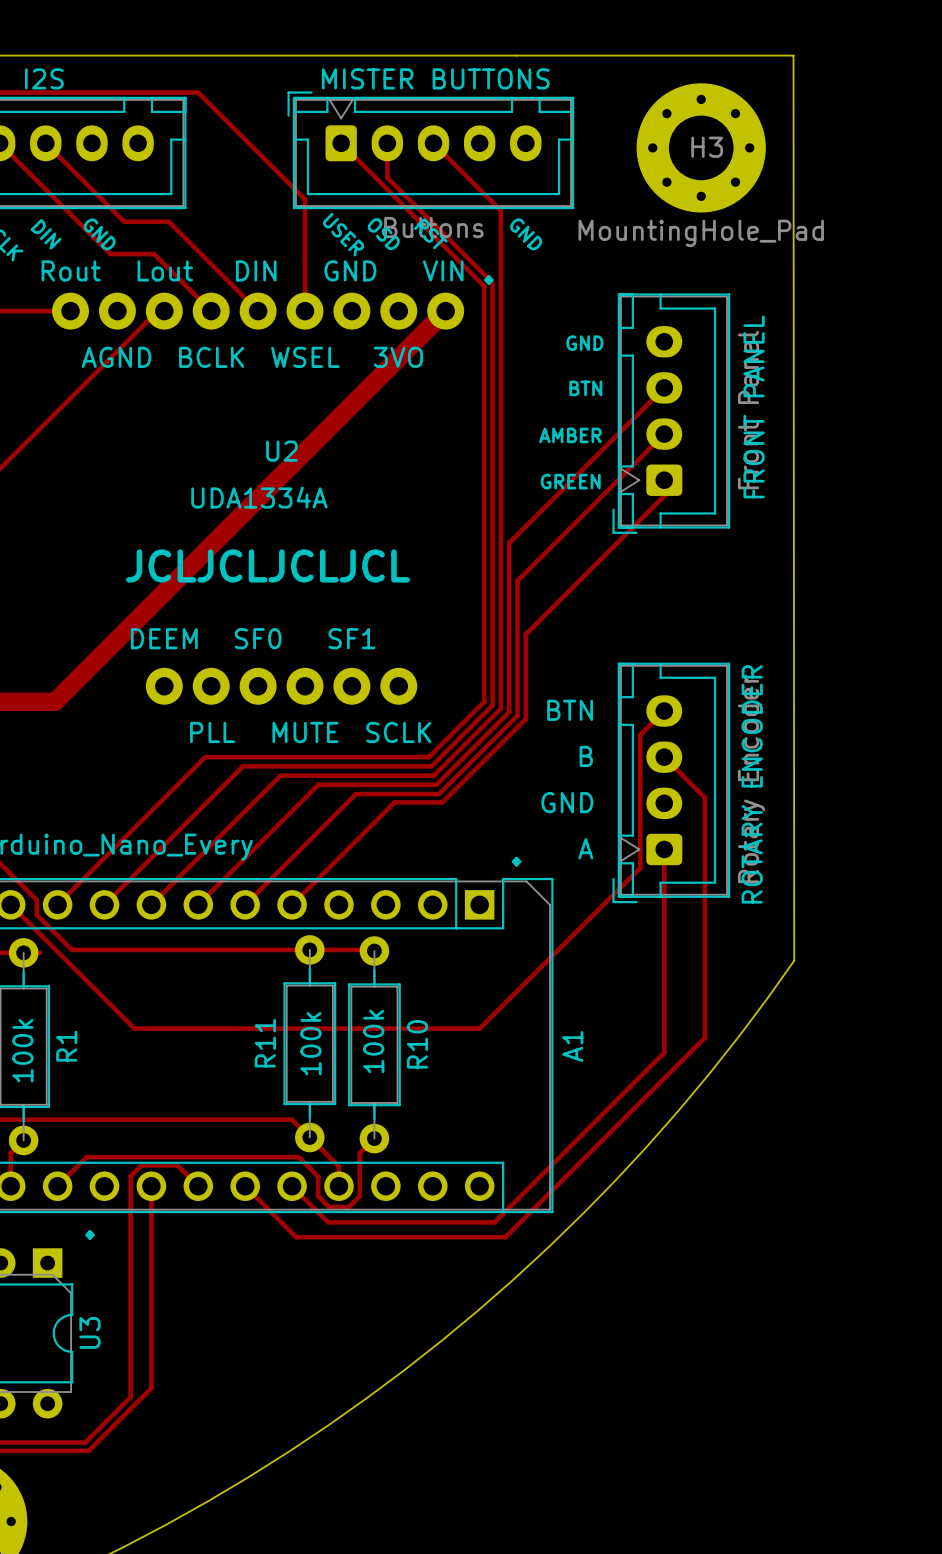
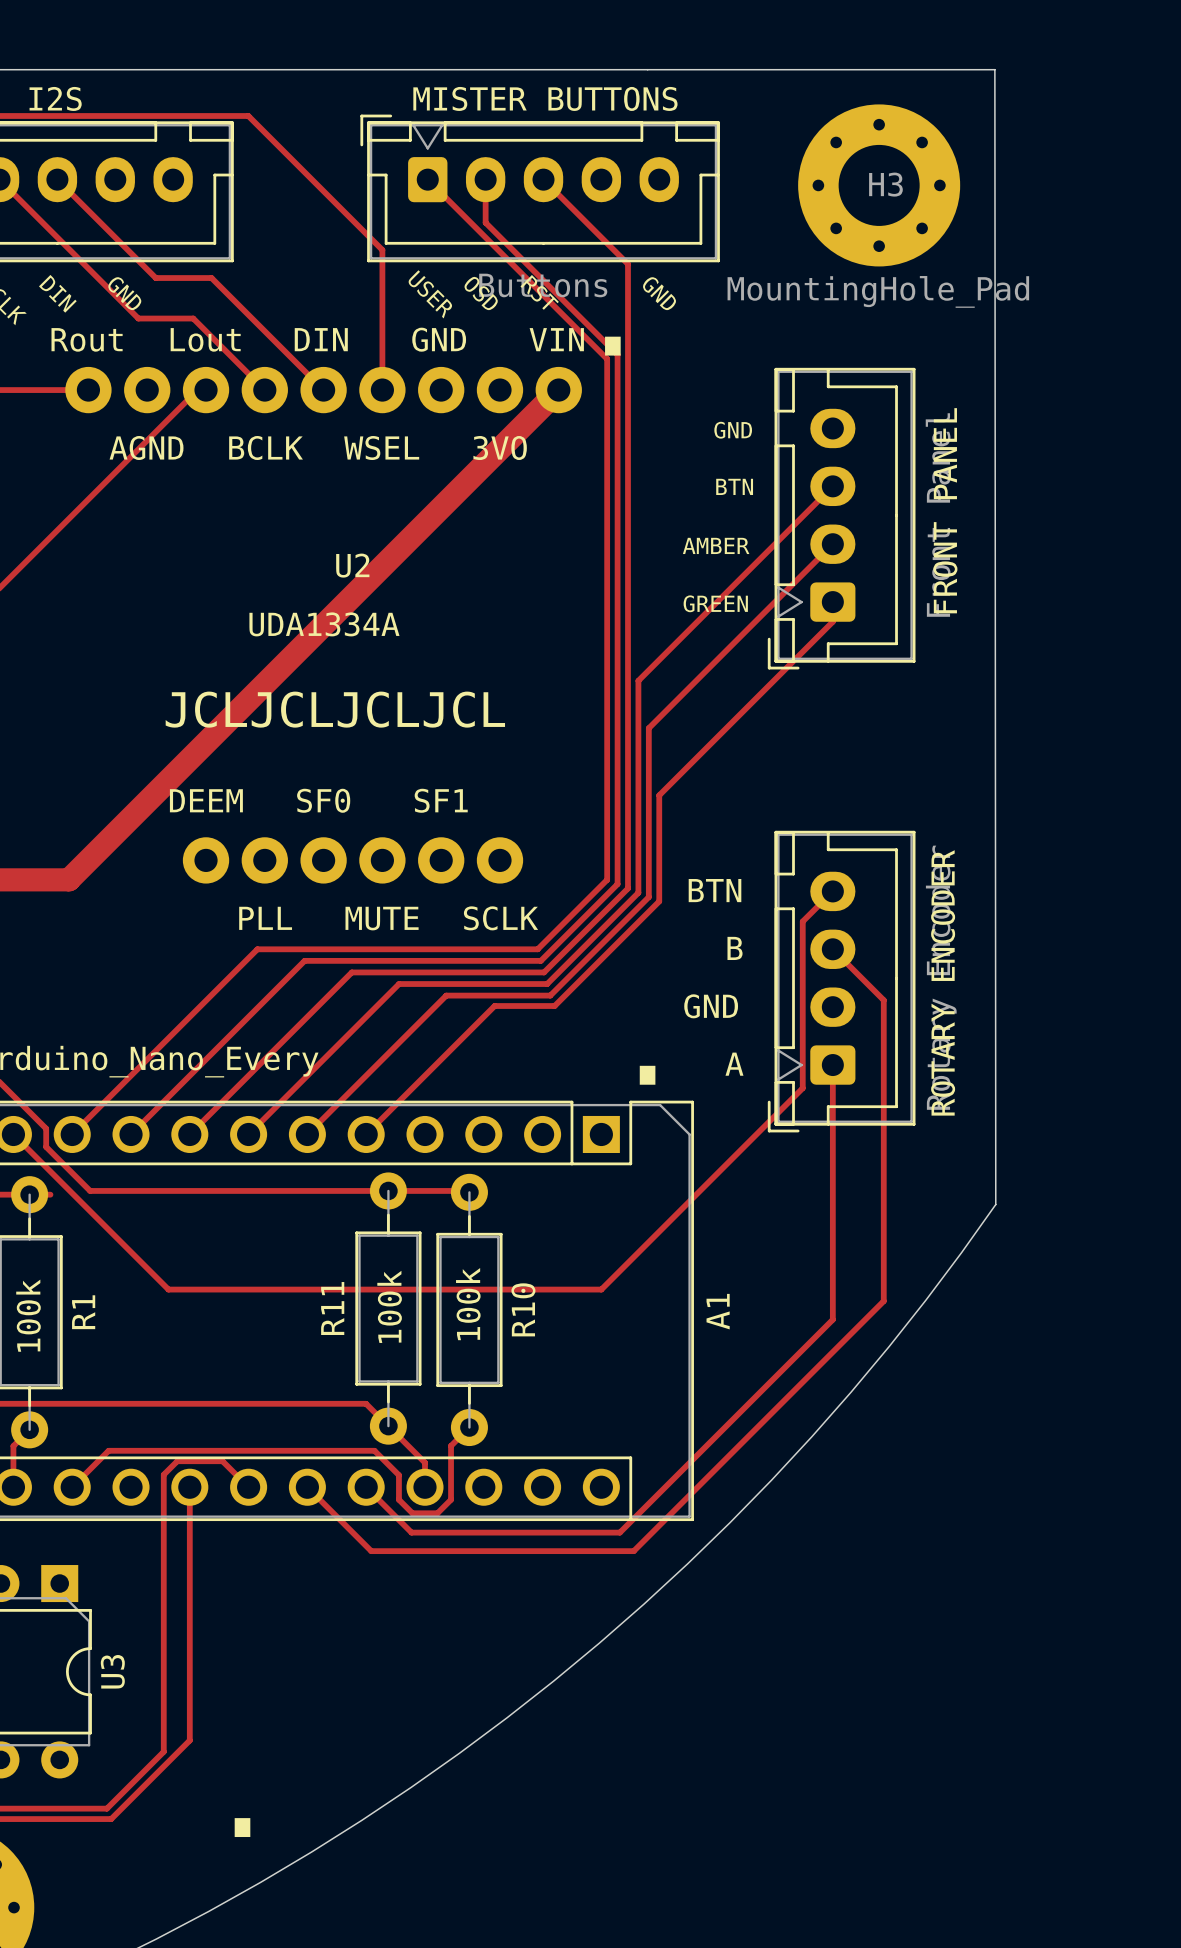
text position: . (89, 1234) -> . (242, 1827)

